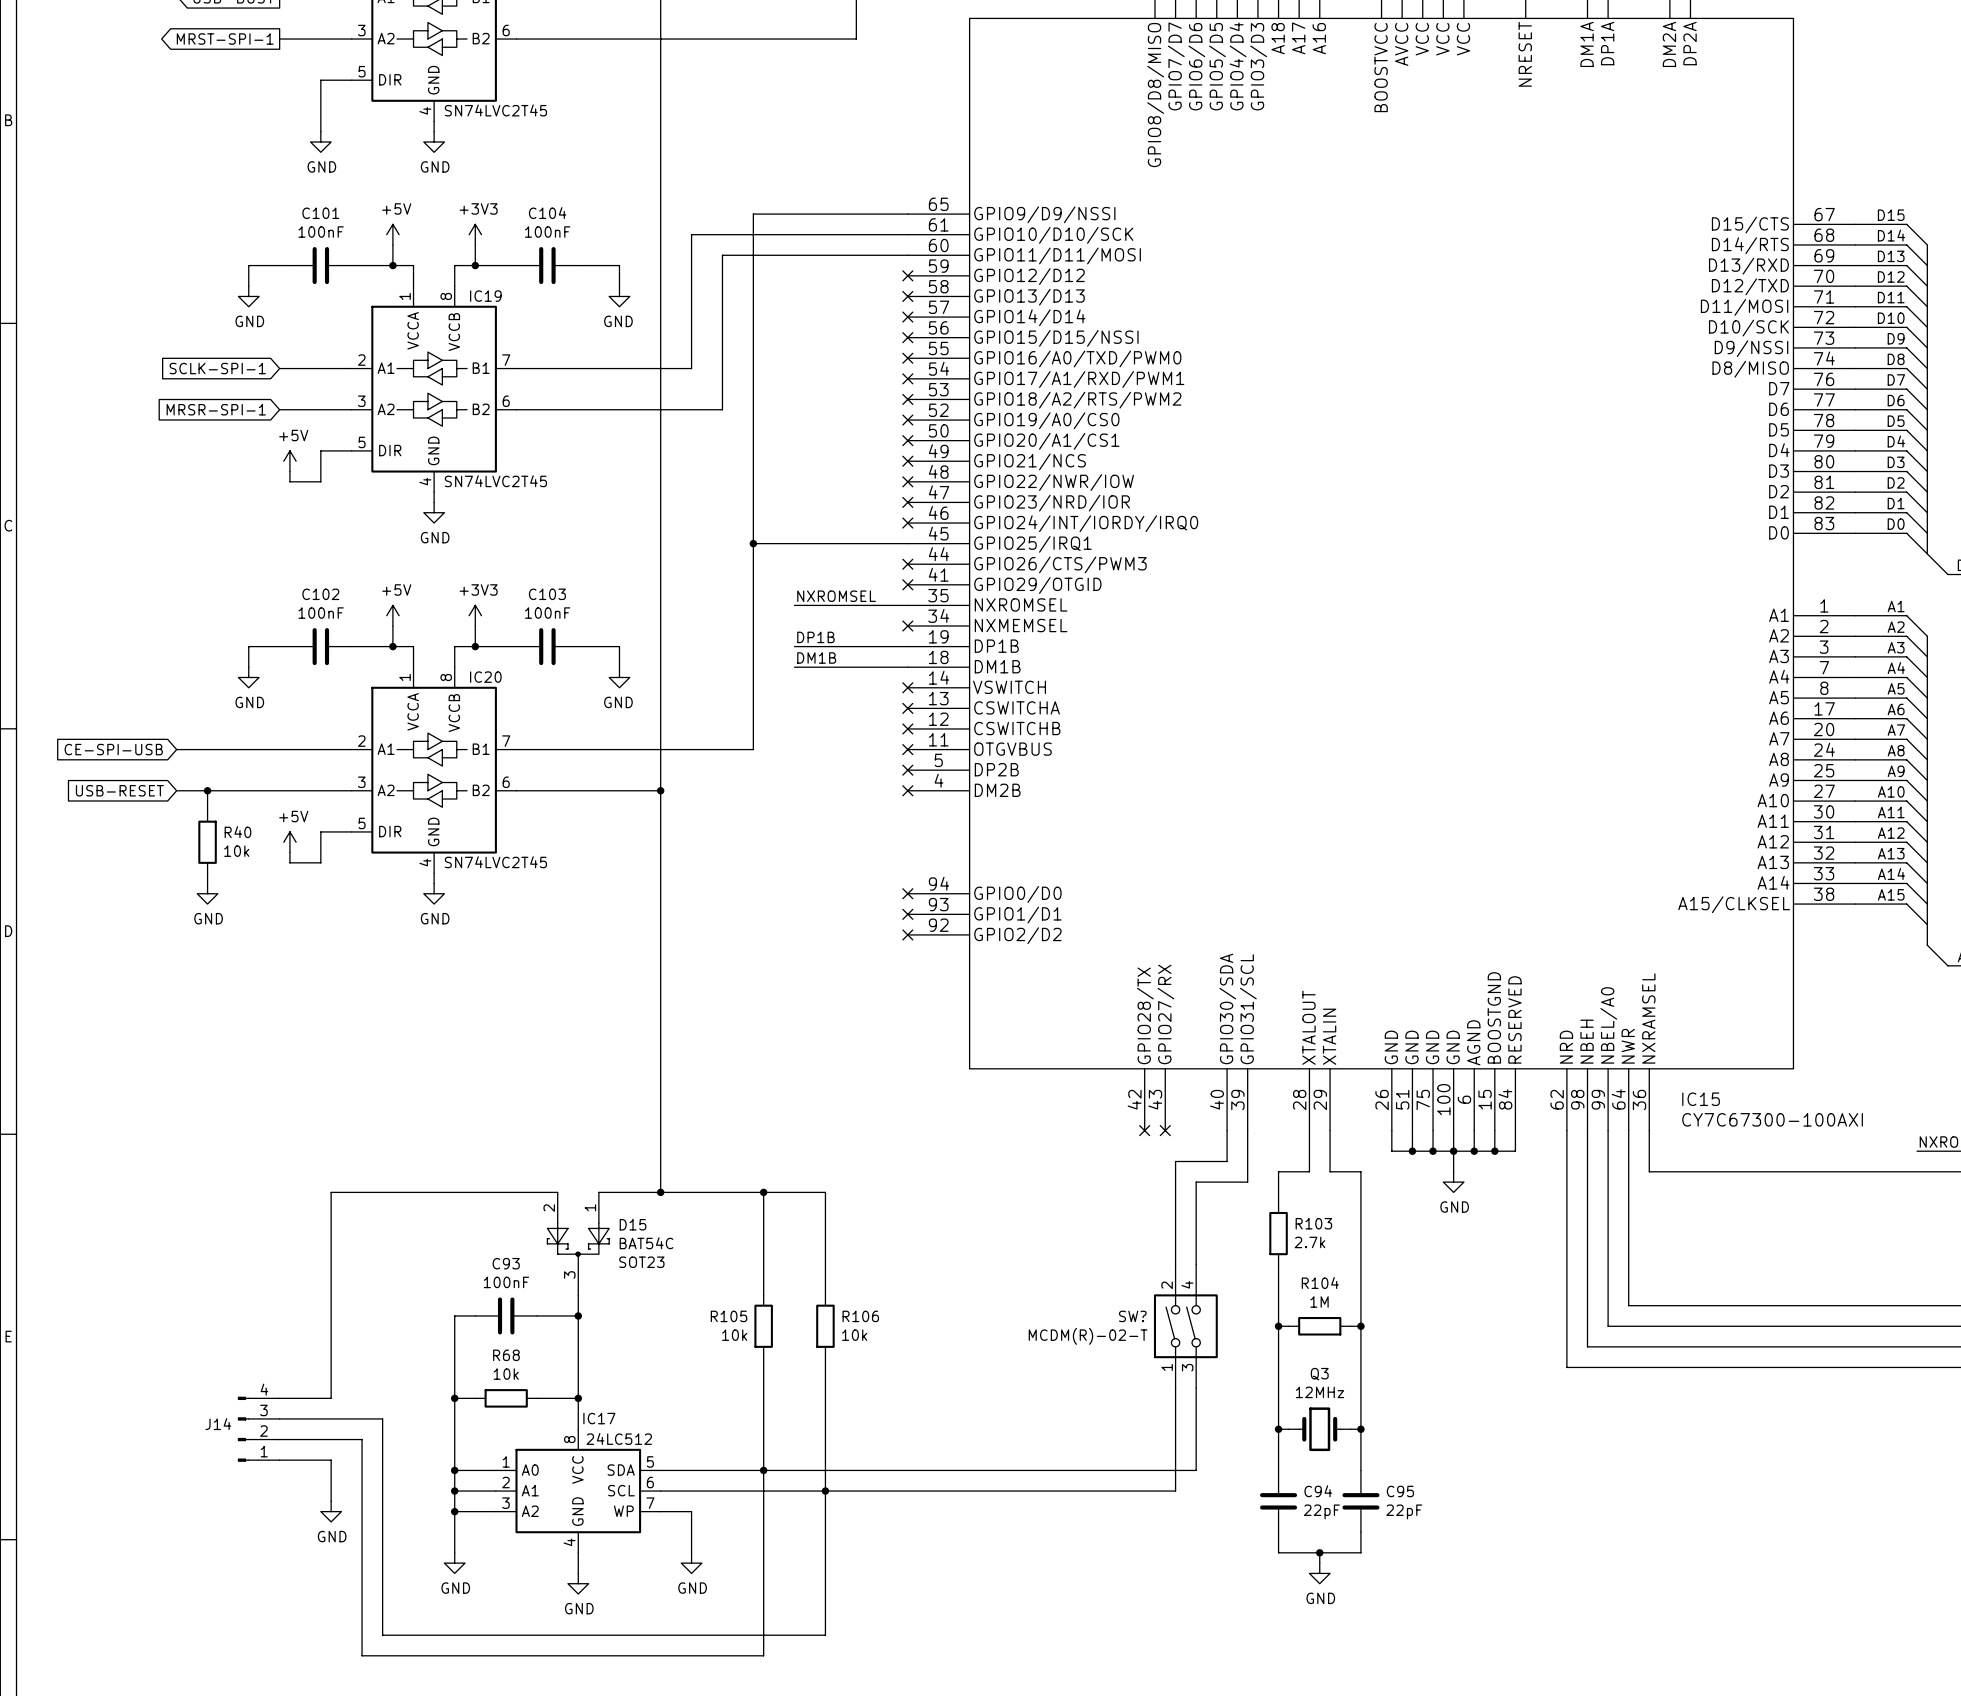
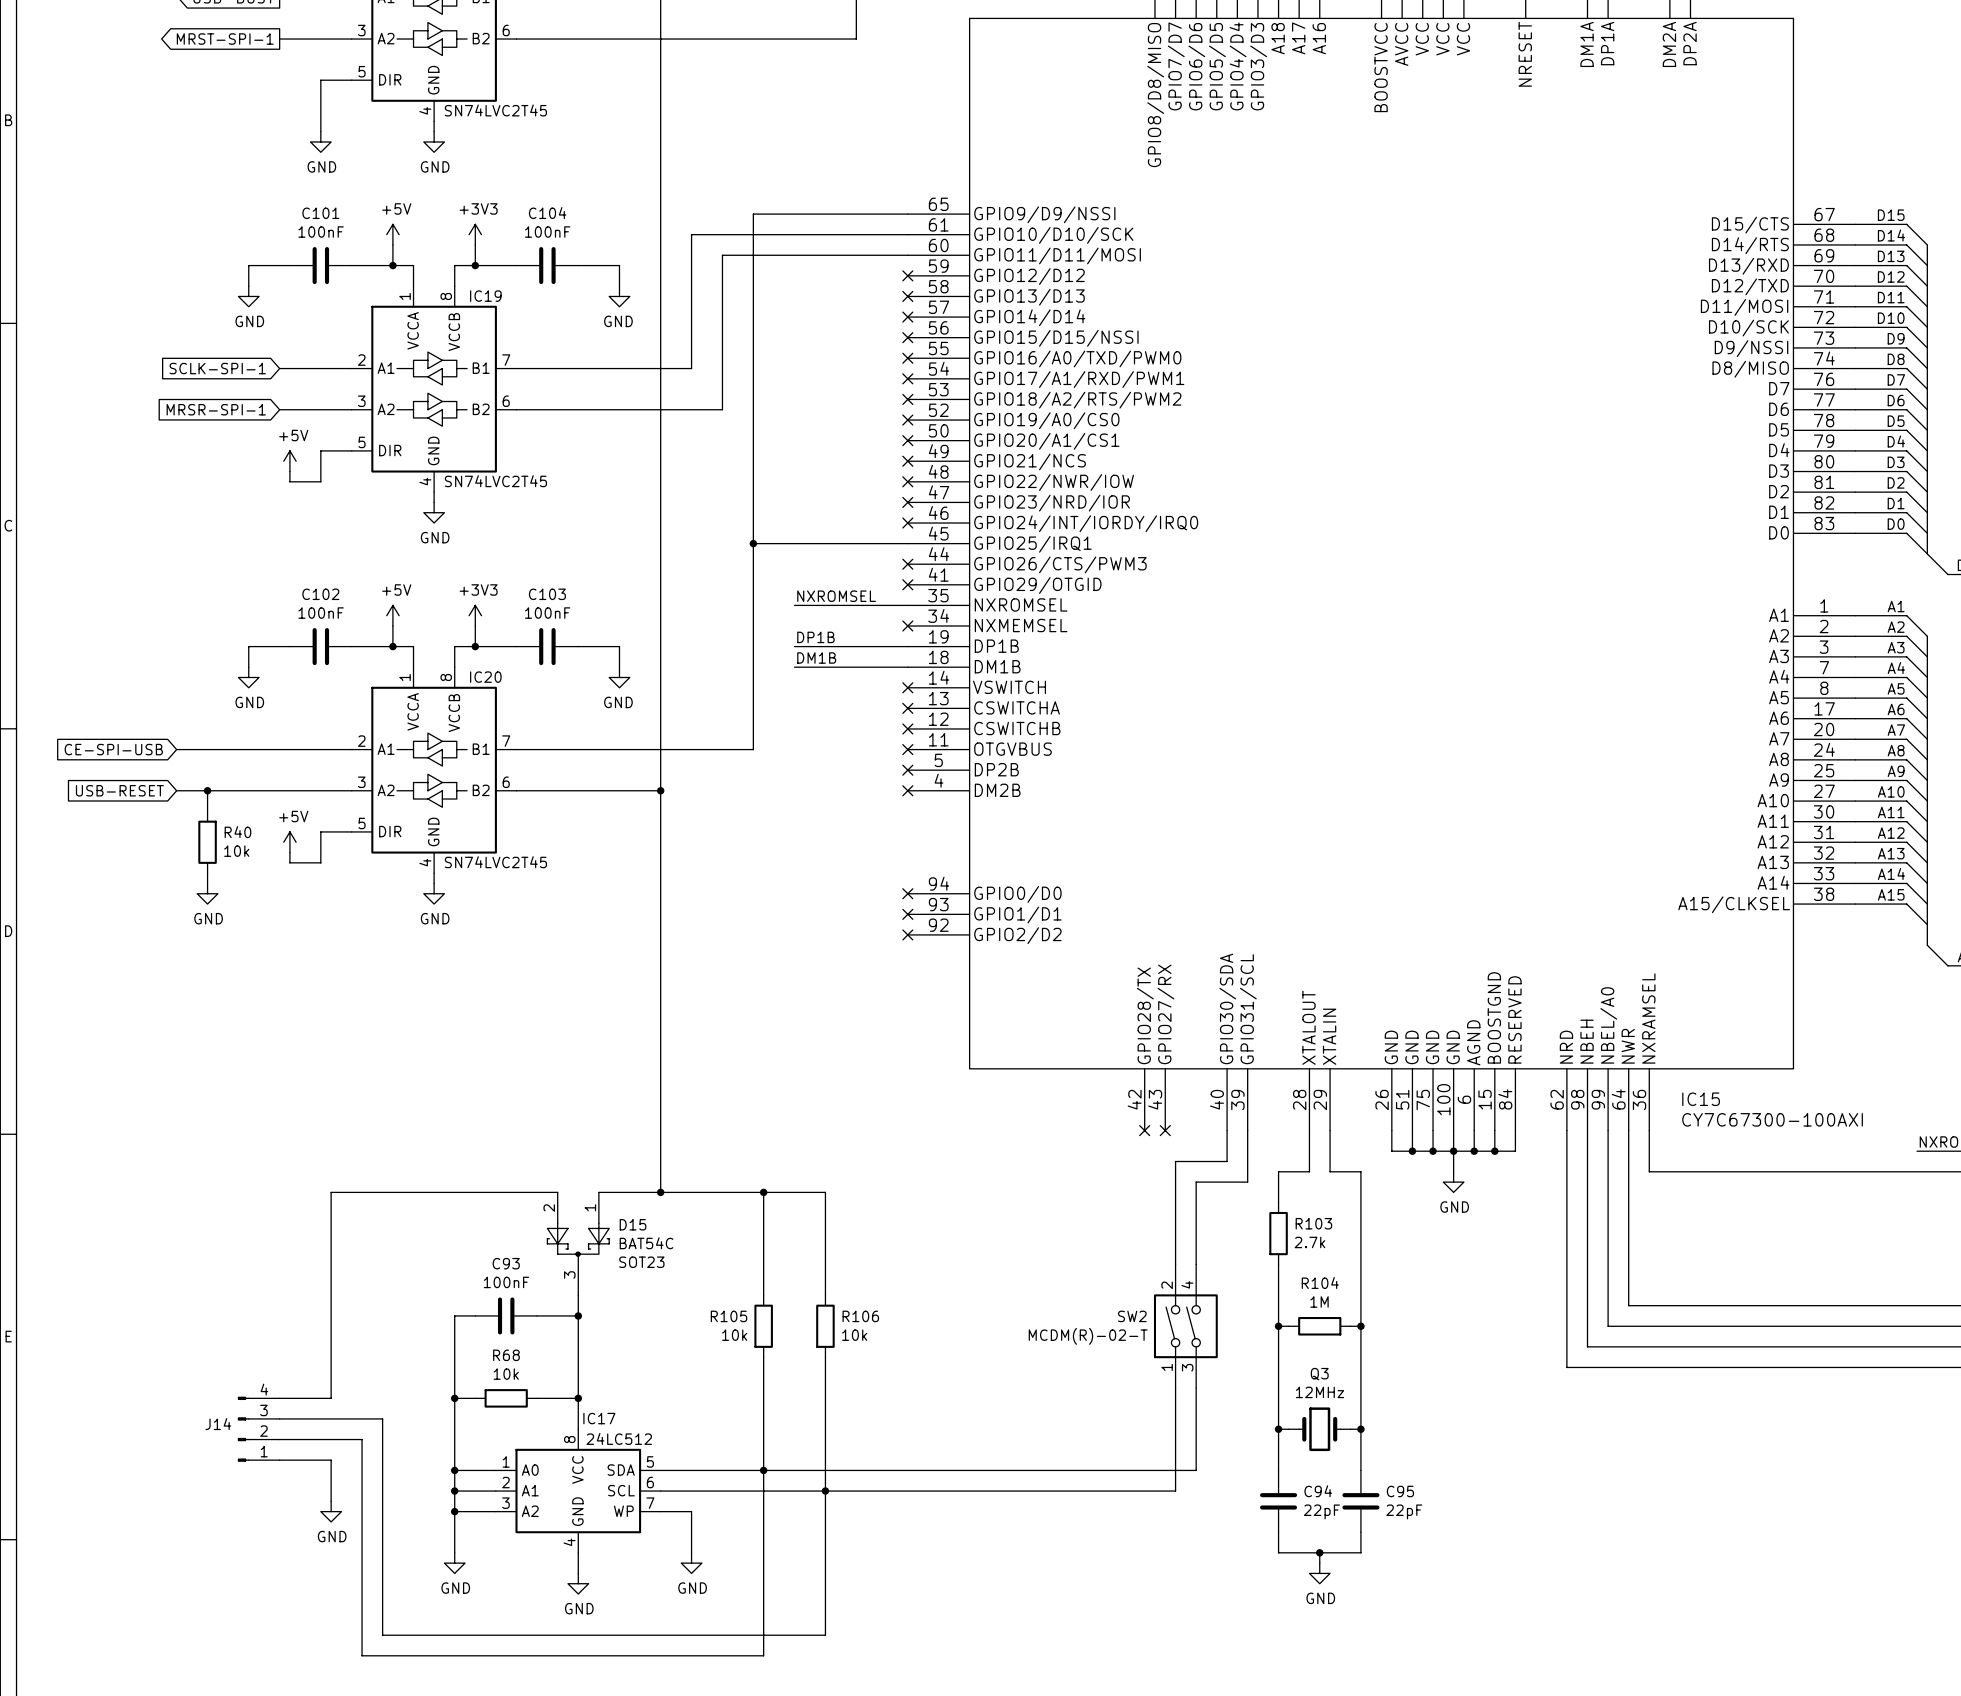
SW? name: SW? (1132, 1316) -> SW2 (1132, 1316)

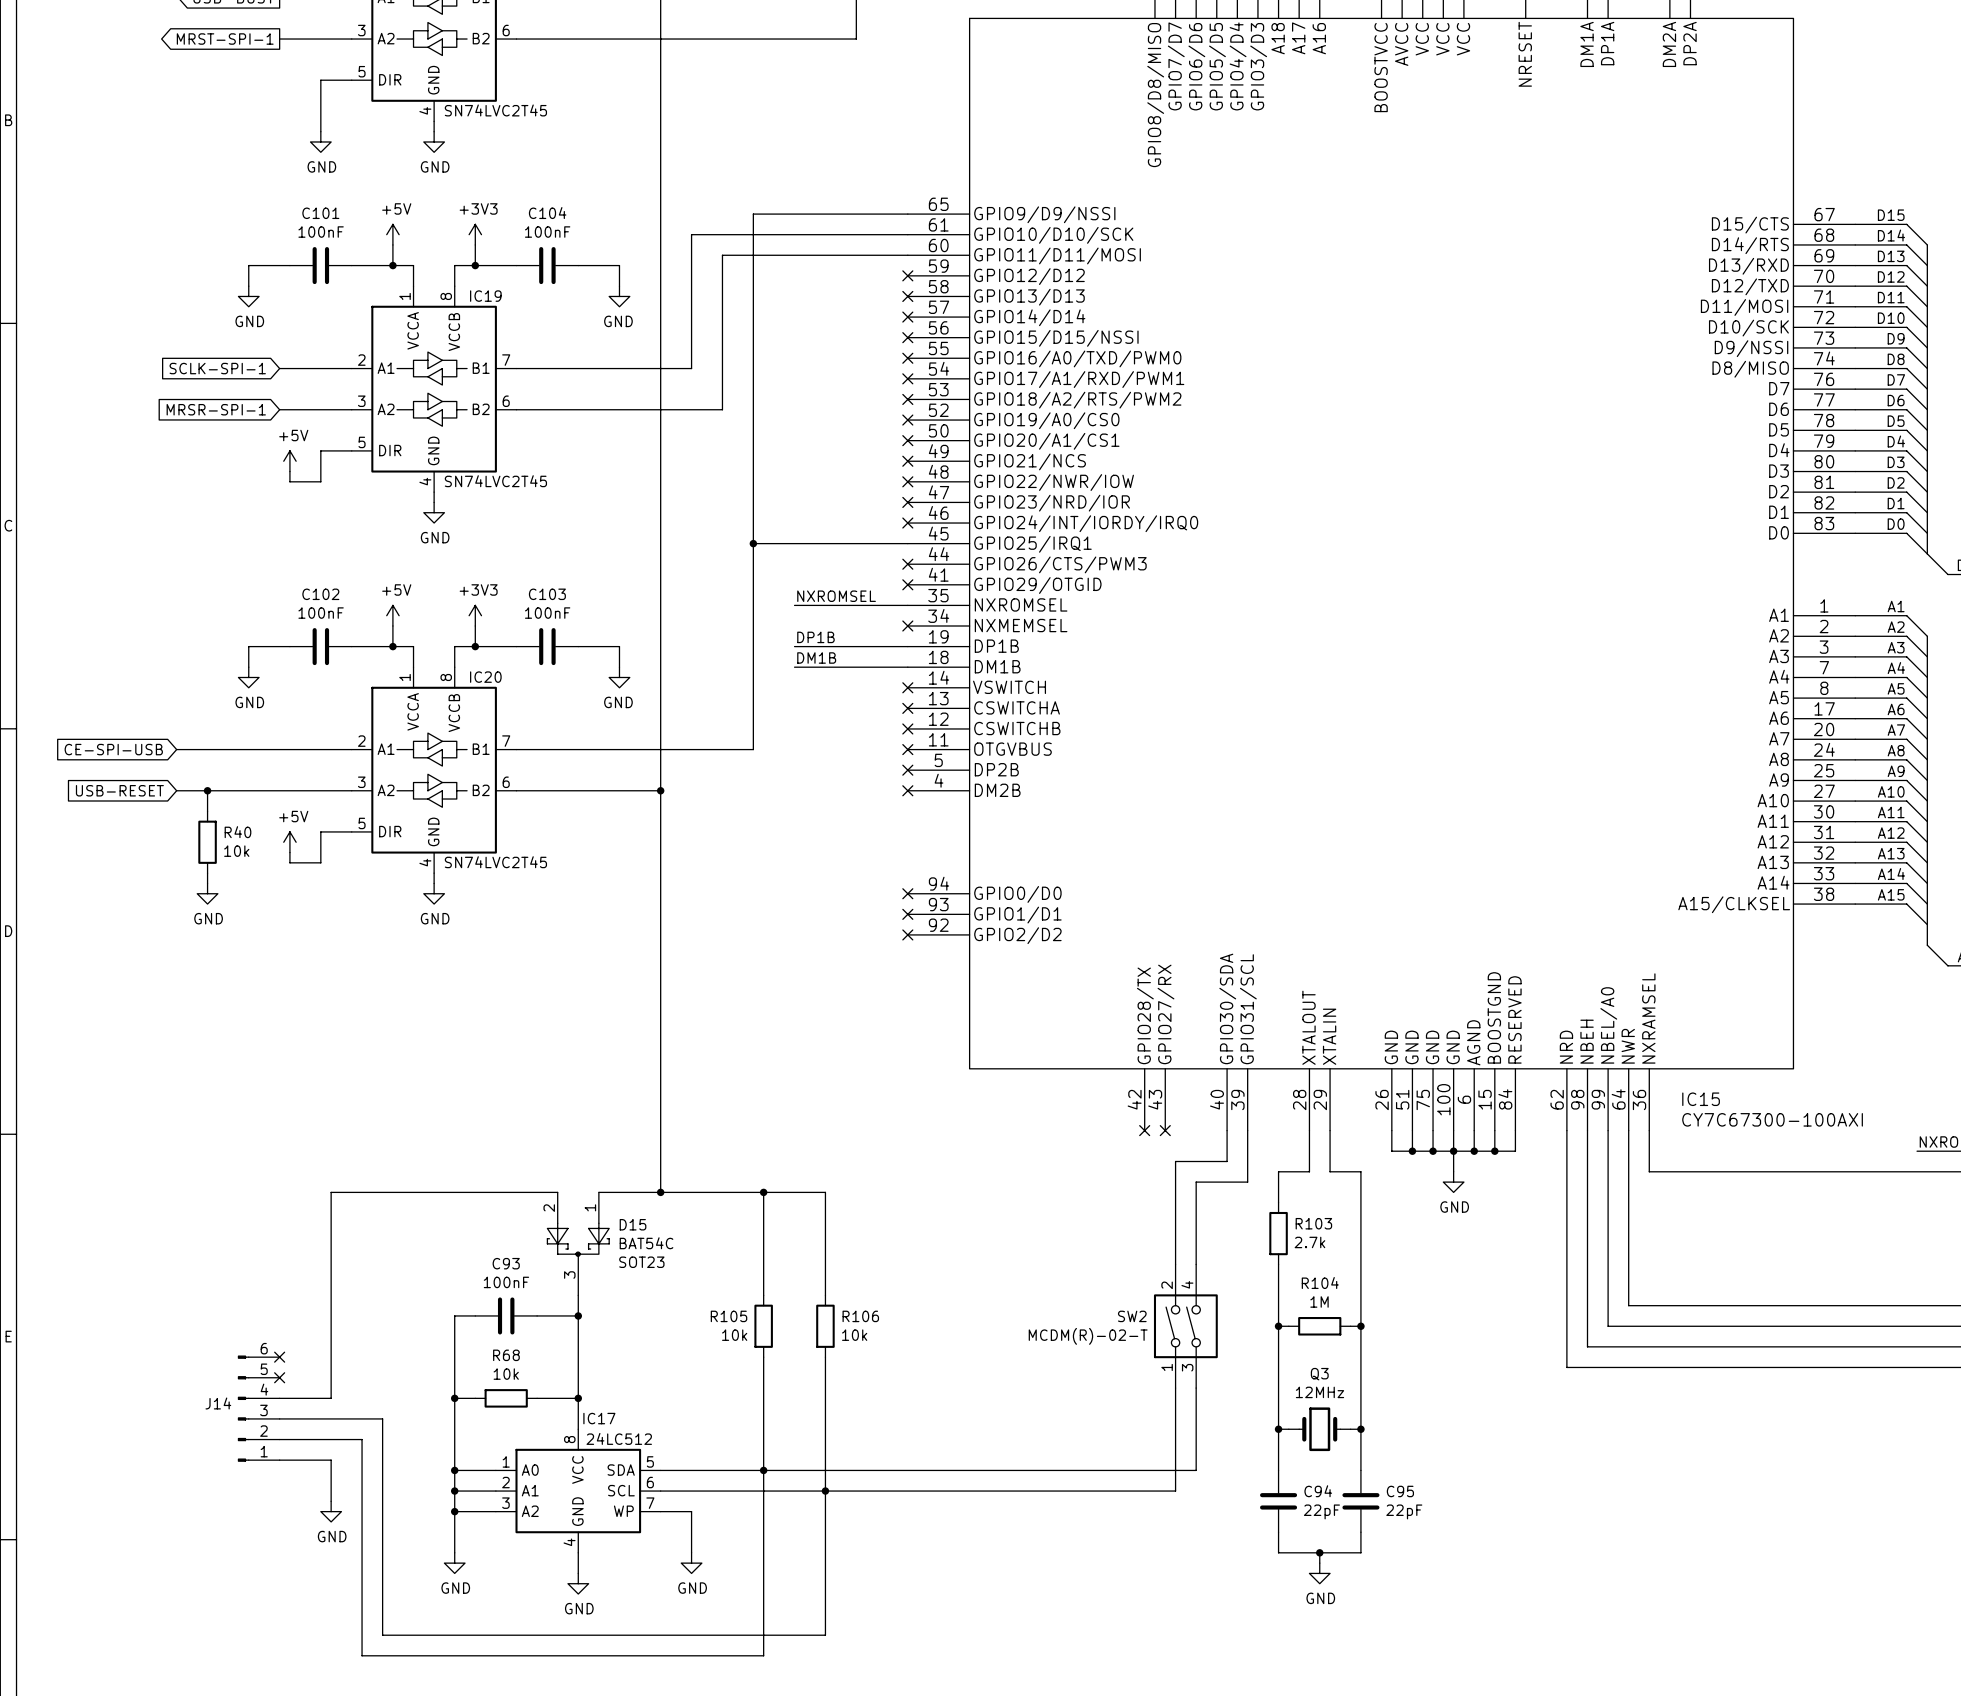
no-connect mark: none -> (279, 1357)
no-connect mark: none -> (279, 1377)
J14 symbol: [237, 1396, 280, 1462] -> [237, 1355, 280, 1462]

